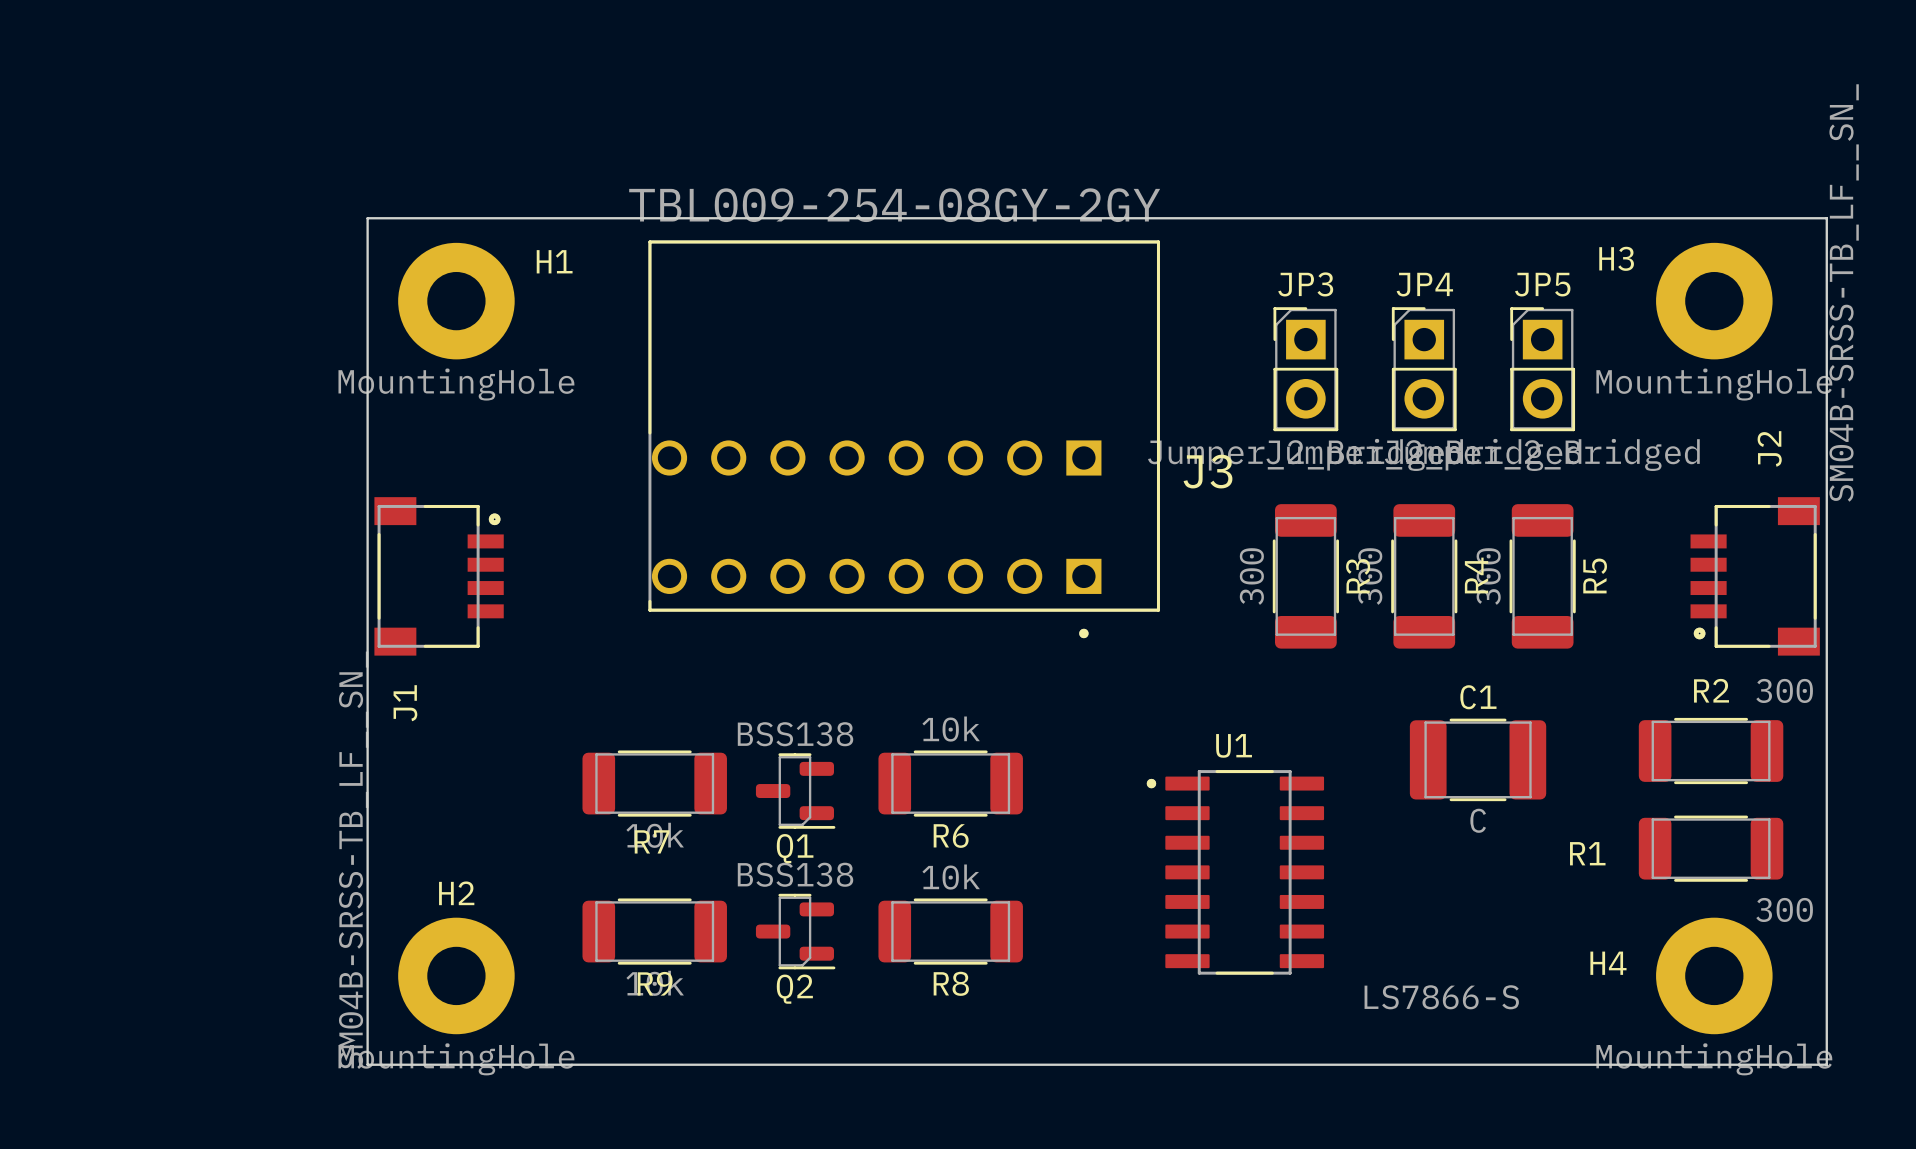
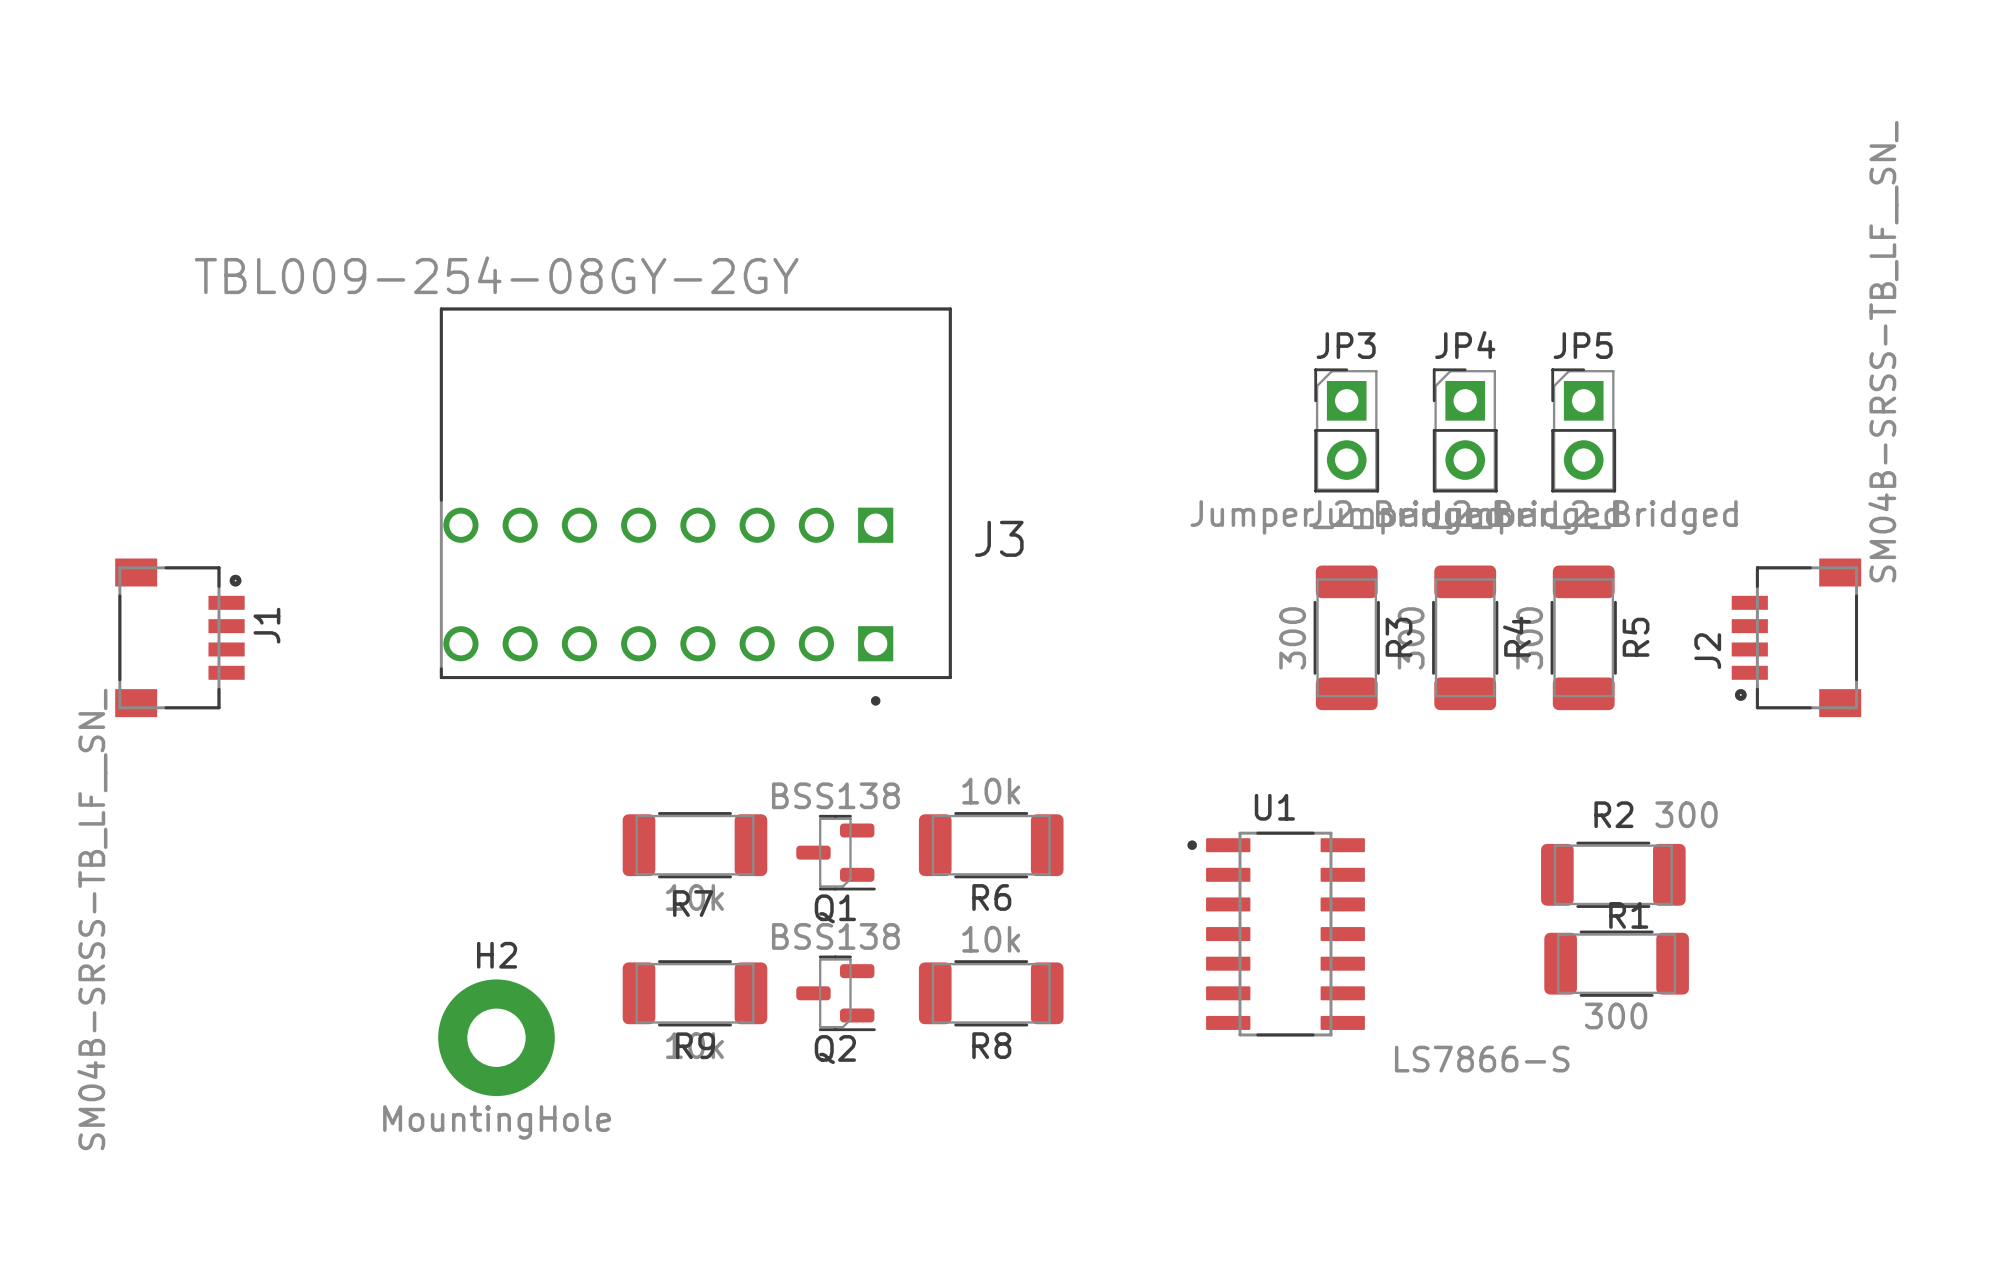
J3 value position: TBL009-254-08GY-2GY (894, 205) -> TBL009-254-08GY-2GY (496, 275)
board edge: (367, 218) (1826, 218) (1826, 1064) (367, 1064) (367, 218) -> none
H1: MountingHole (456, 301) -> none
H3: MountingHole (1714, 301) -> none
J3 position: (904, 439) -> (695, 506)
J2 name position: J2 (1769, 448) -> J2 (1707, 651)
J1 position: (439, 576) -> (179, 637)
J1 name position: J1 (405, 703) -> J1 (266, 625)
R2 position: (1711, 751) -> (1613, 874)
C1: C (1478, 759) -> none
R1 position: (1711, 848) -> (1616, 963)
R1 value position: 300 (1784, 909) -> 300 (1616, 1016)
H4: MountingHole (1714, 975) -> none

